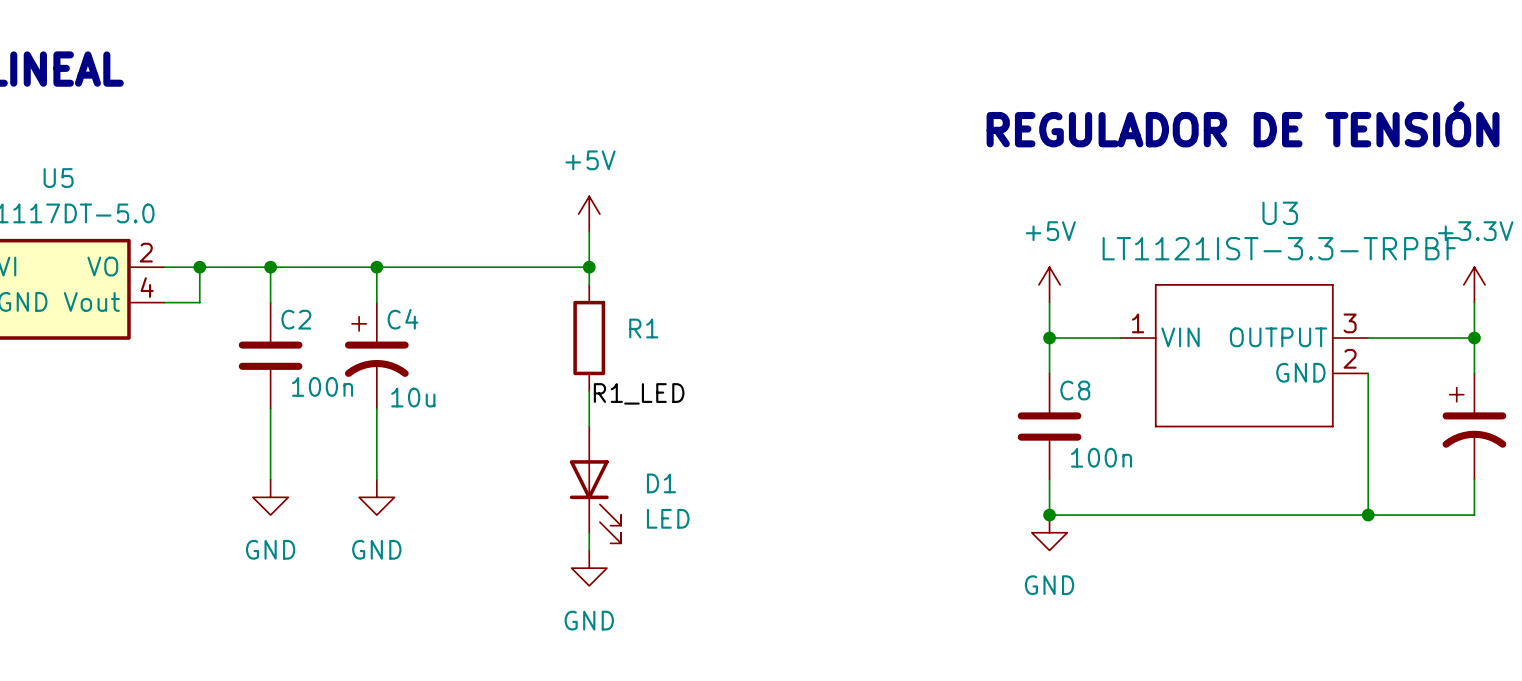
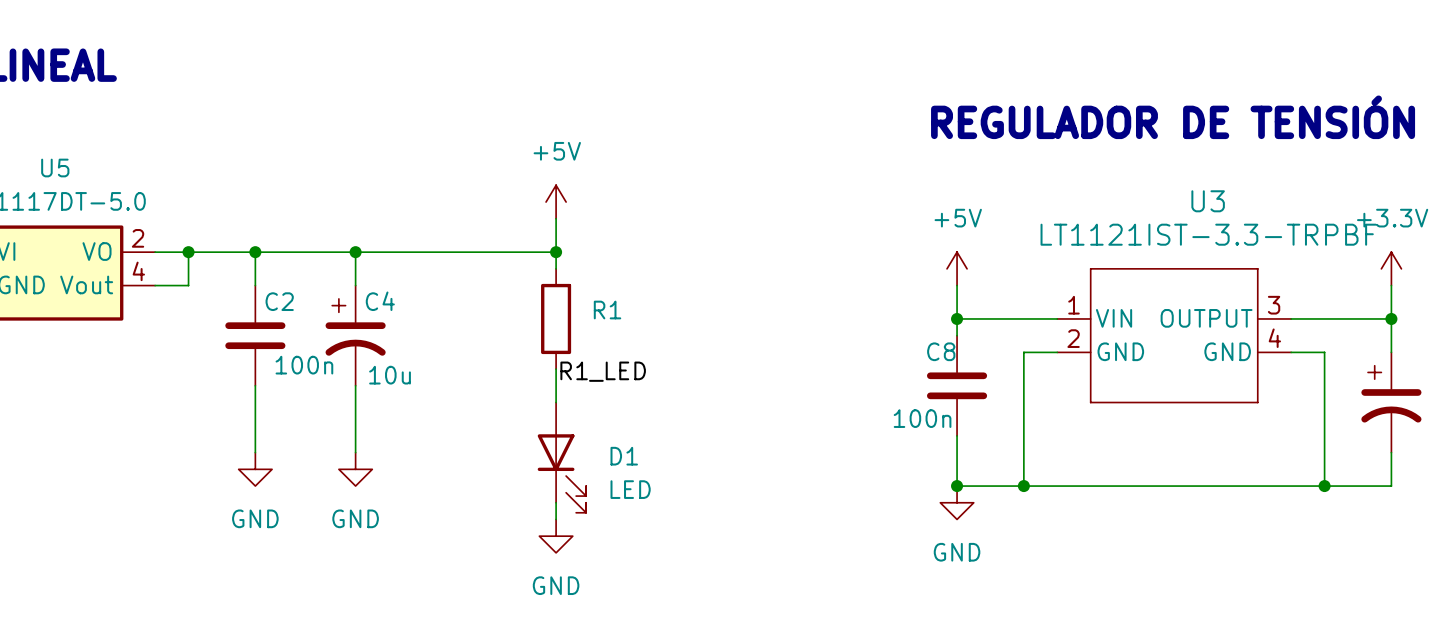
power symbol position: +5V (1049, 284) -> +5V (957, 268)
U3 symbol: [1120, 284, 1369, 428] -> [1057, 268, 1292, 404]
wire: none -> (957, 285) (957, 335)
wire: (1049, 302) (1049, 373) -> none
wire: none -> (957, 318) (990, 318)
junction position: (1049, 338) -> (957, 318)
wire: none -> (1057, 352) (1023, 352) (1023, 486)
wire: (1368, 373) (1368, 515) -> (1291, 352) (1324, 352) (1324, 486)
C8 name position: C8 (1075, 390) -> C8 (941, 351)
C8 position: (1049, 426) -> (957, 385)
C8 value position: 100n (1101, 457) -> 100n (922, 418)
wire: (1049, 479) (1049, 515) -> (957, 435) (957, 486) (990, 486)
junction: none -> (957, 486)
junction: (1049, 515) -> none
junction: none -> (1023, 486)
junction position: (1368, 515) -> (1324, 486)
power symbol position: GND (1049, 532) -> GND (957, 502)

